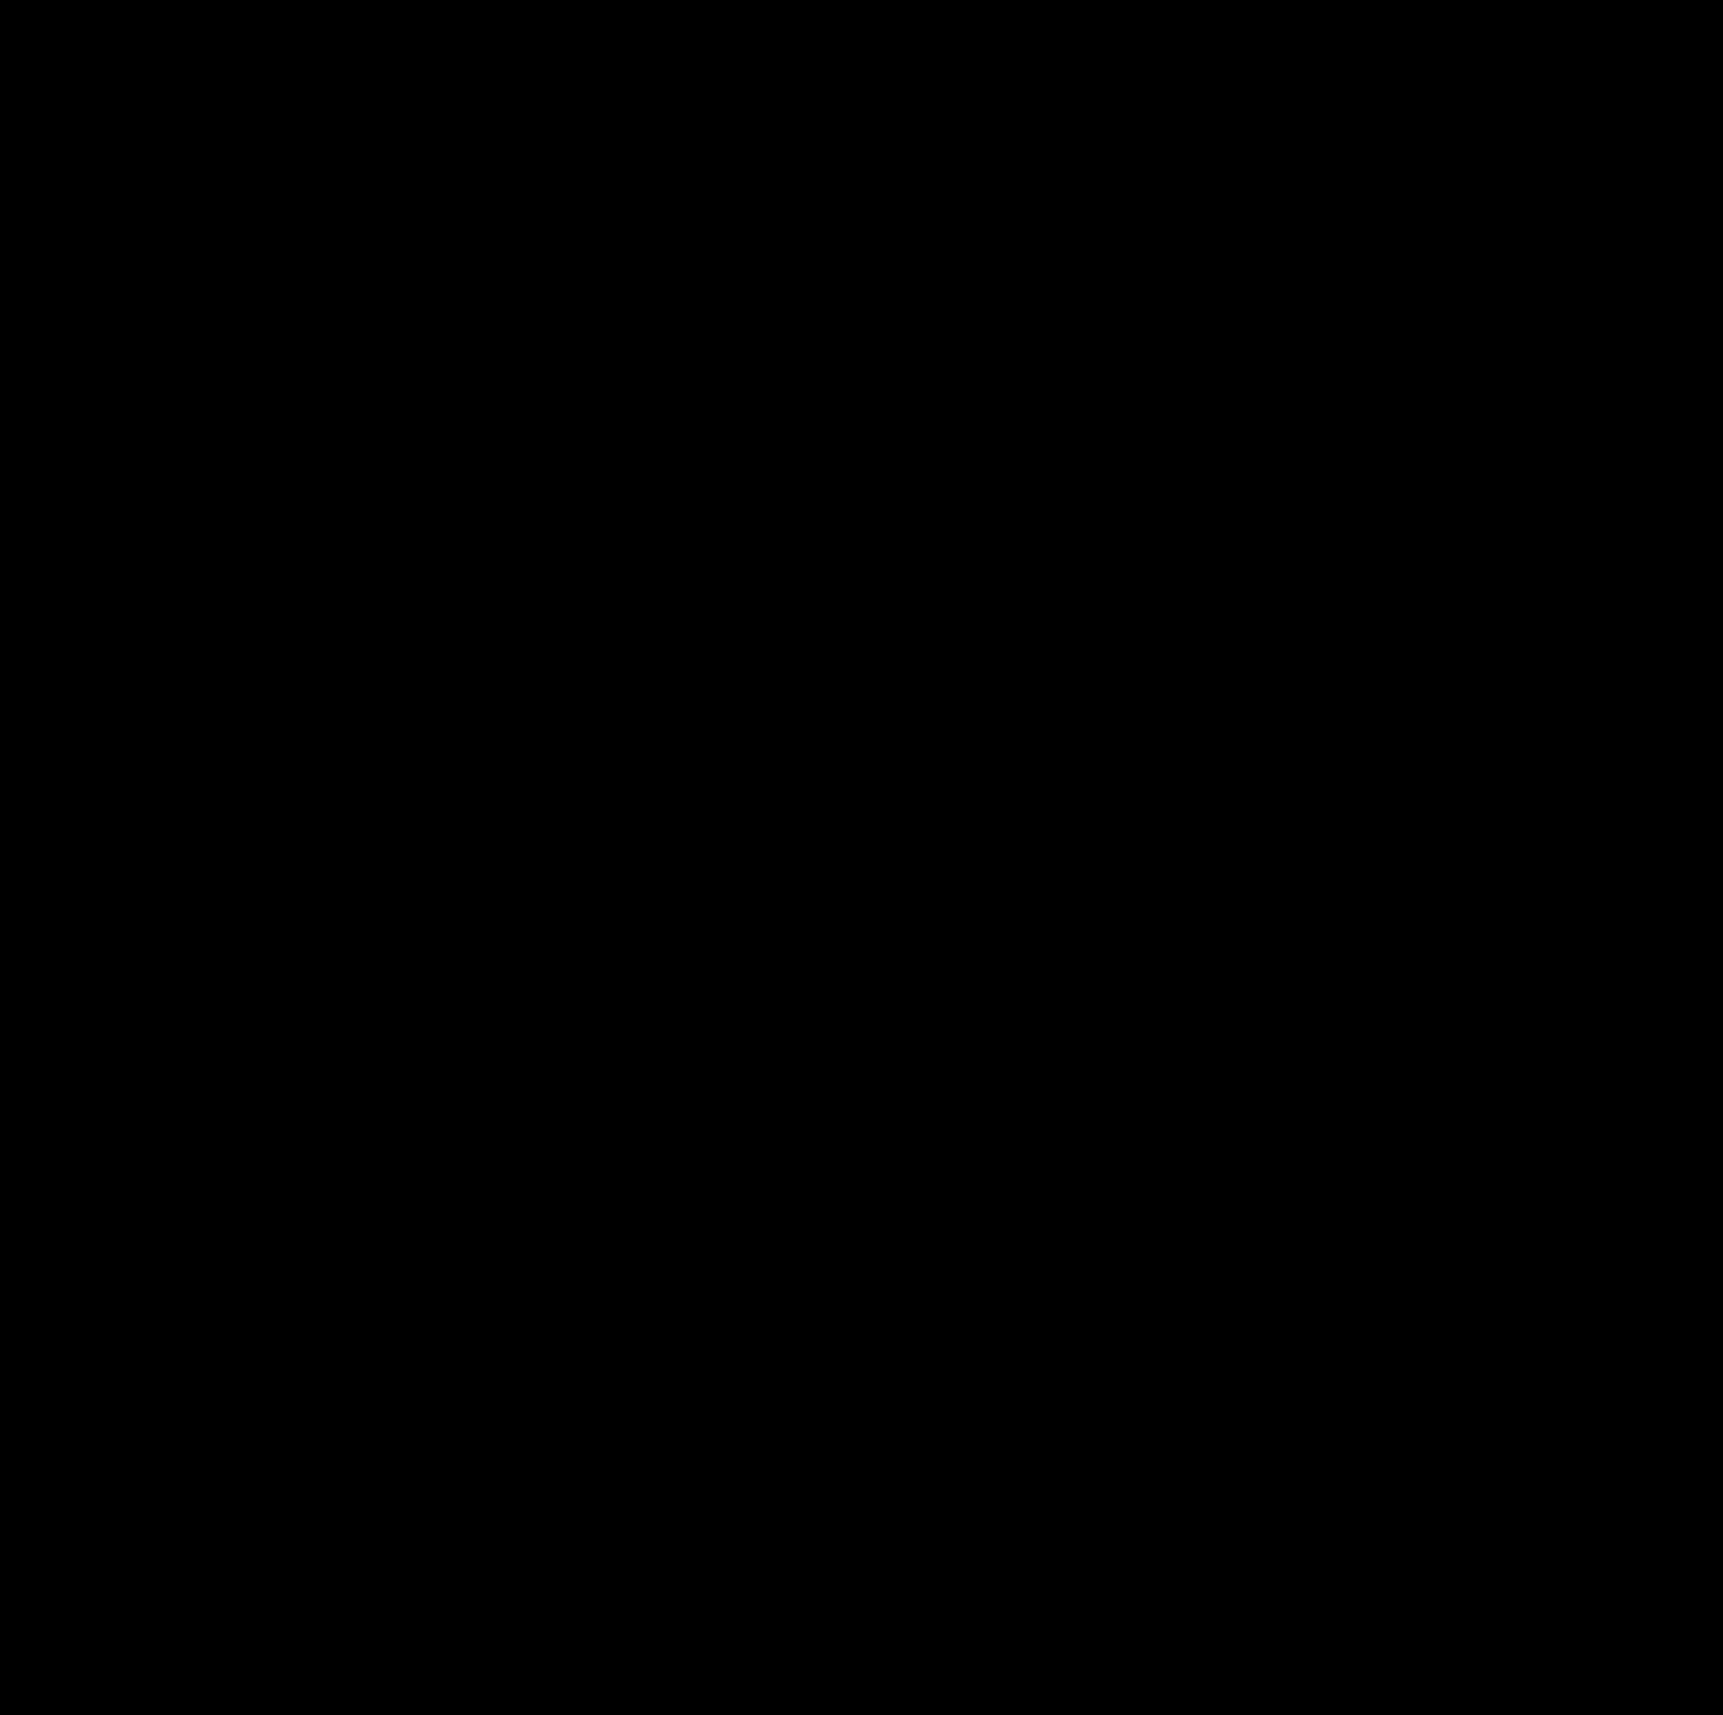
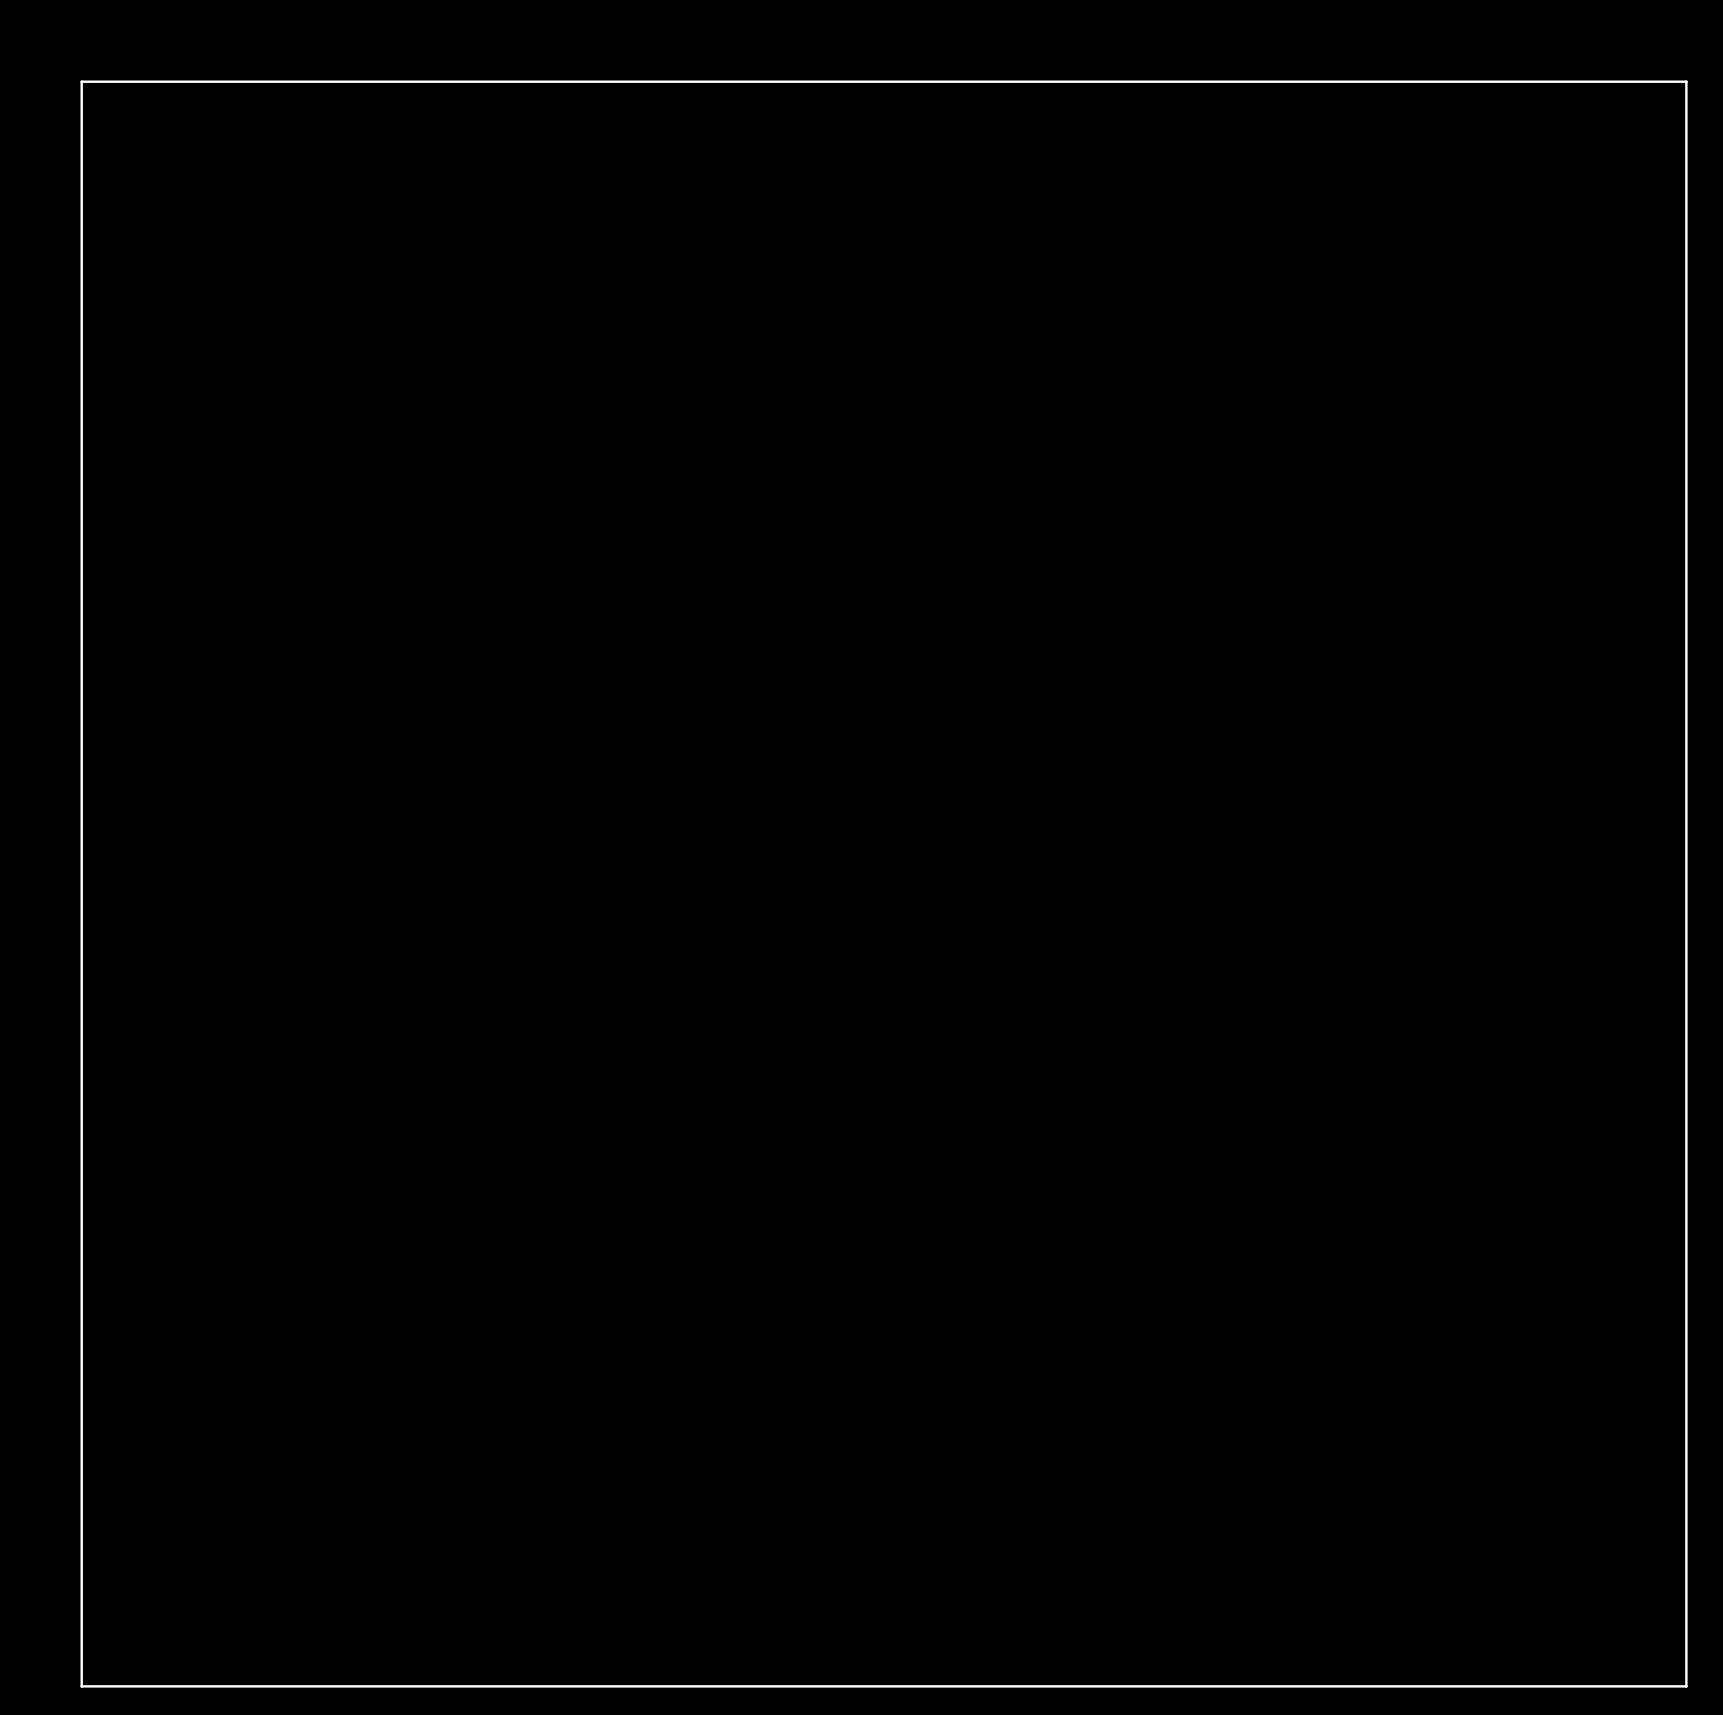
board edge: none -> (81, 81) (1686, 81) (1686, 1686) (81, 1686) (81, 81)

